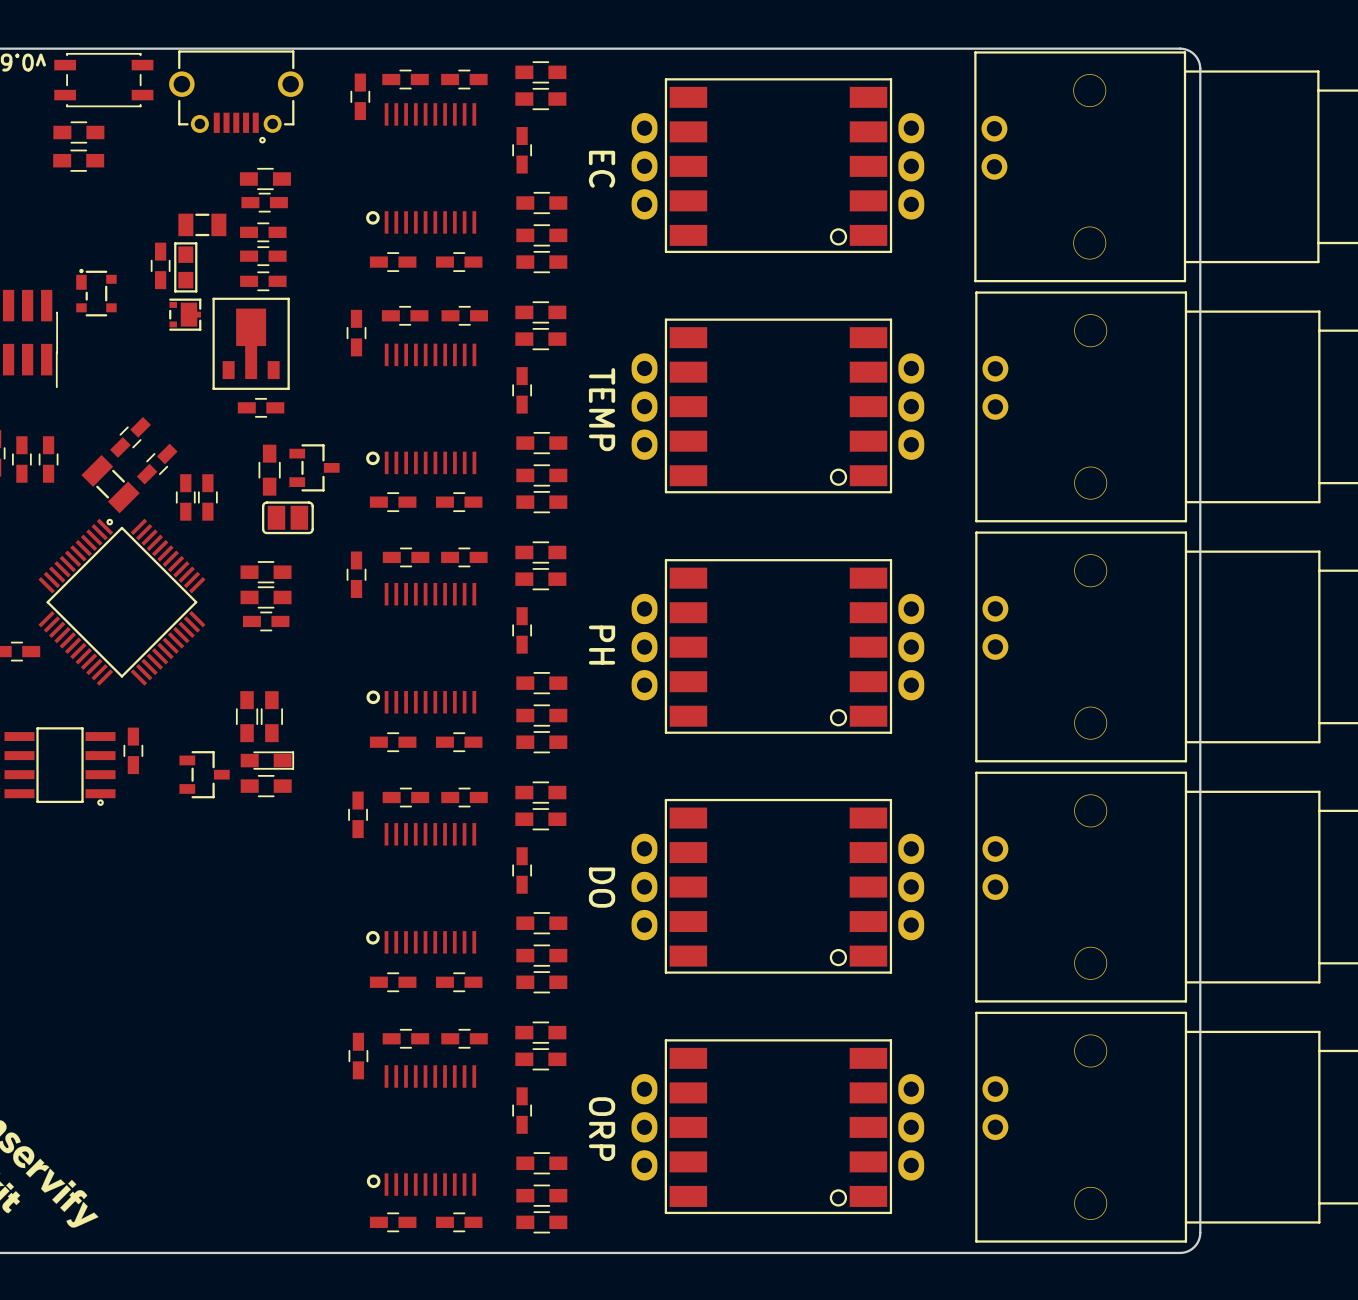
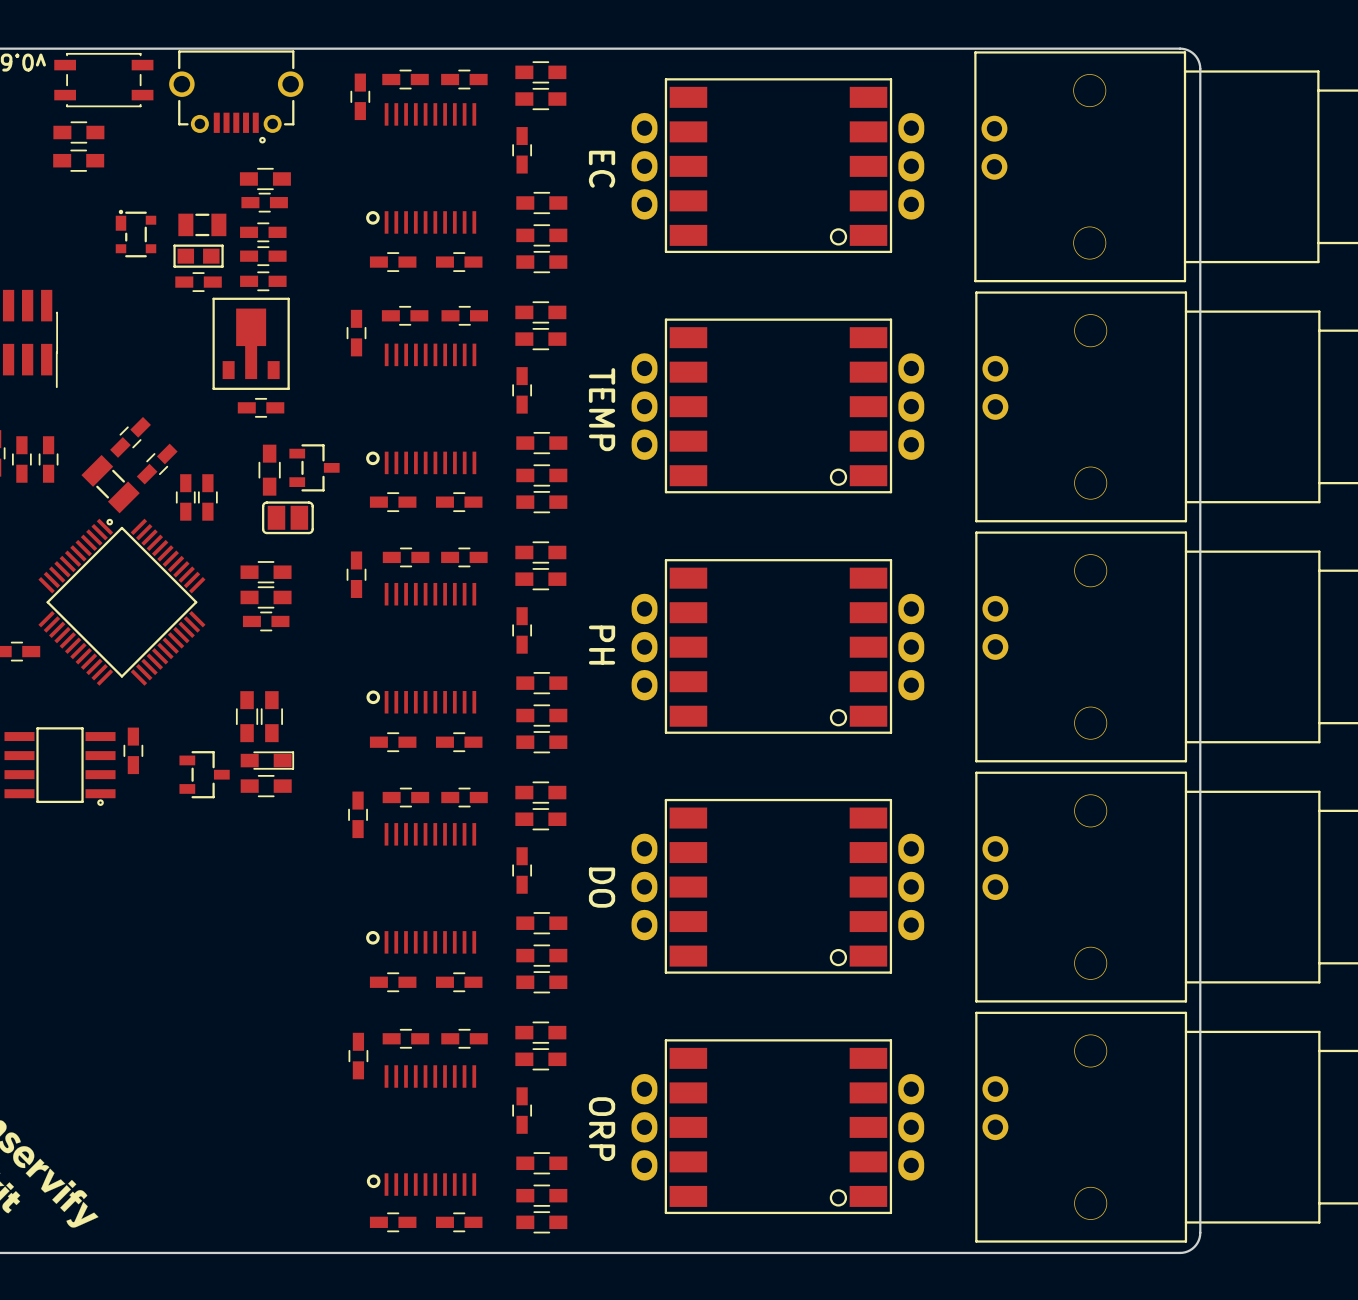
part rotation: 0° (160, 265) -> 90° clockwise (198, 282)
part position: (160, 265) -> (198, 282)
part rotation: 0° (185, 267) -> 90° clockwise (198, 256)
part position: (96, 292) -> (135, 233)
part: (185, 314) -> none

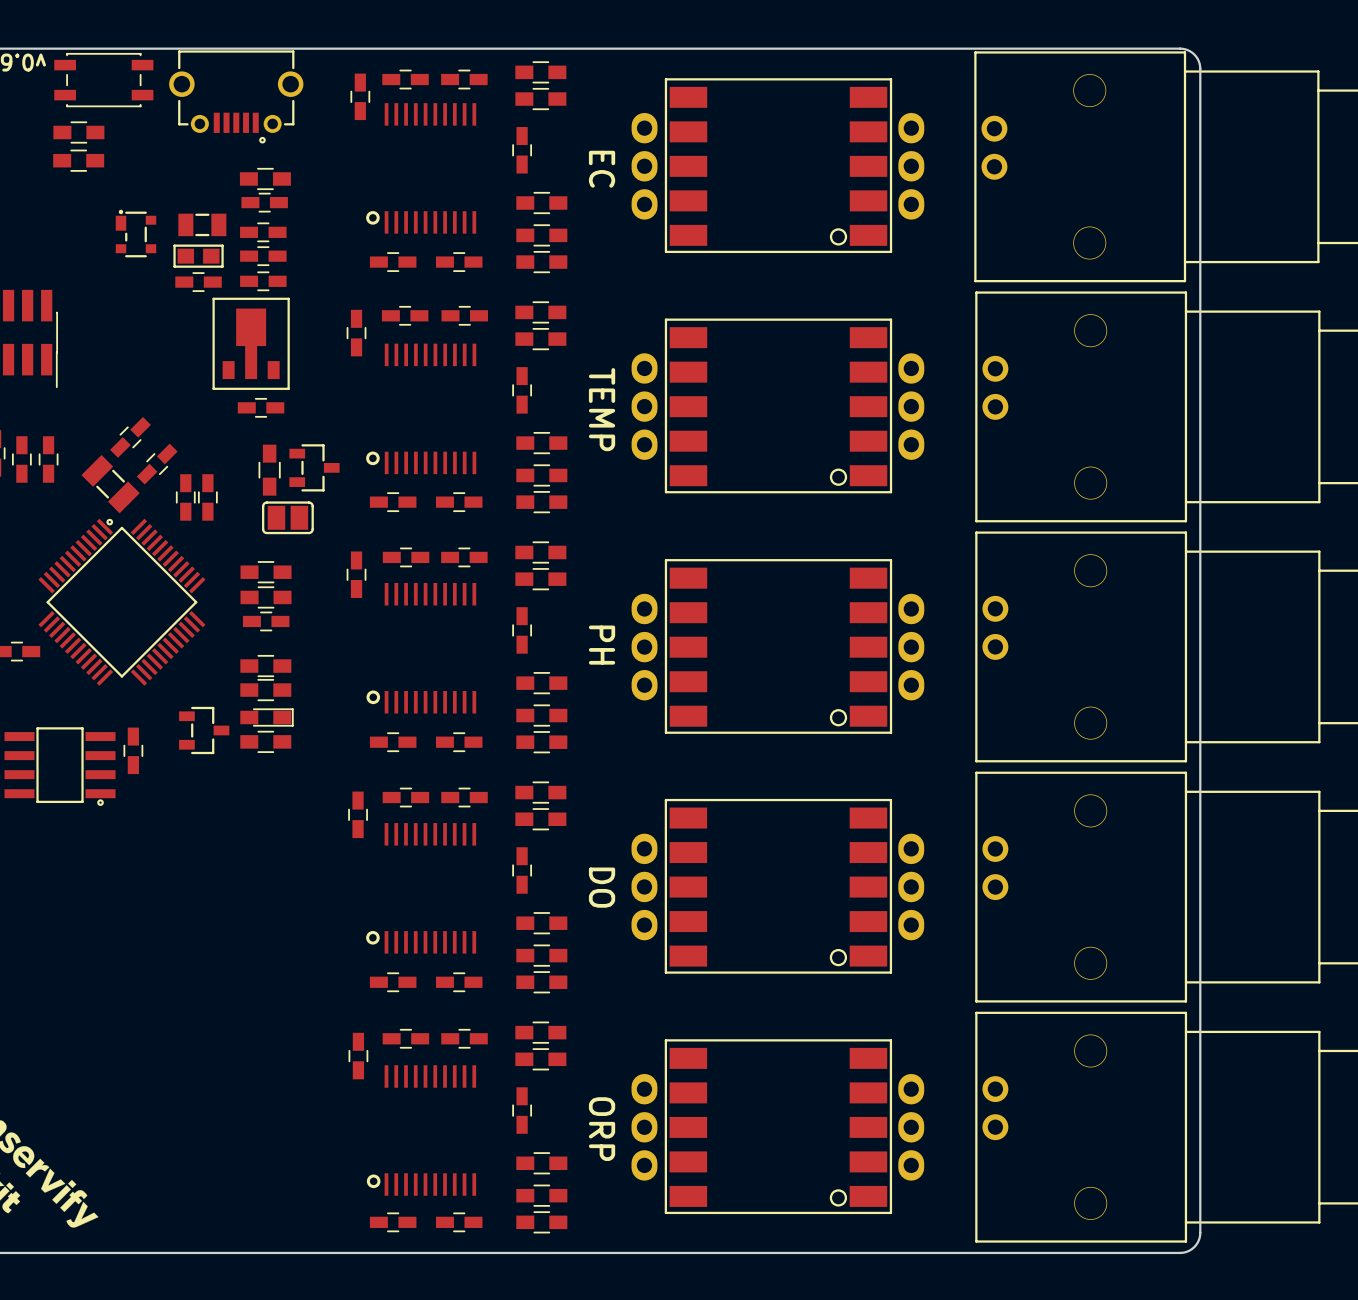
part: none -> (265, 666)
part: none -> (265, 690)
part footprint: [260, 691, 283, 743] -> [240, 708, 294, 727]
part: (247, 716) -> none
part: none -> (265, 741)
part: (267, 760) -> none
part position: (204, 774) -> (204, 730)
part: (266, 786) -> none

